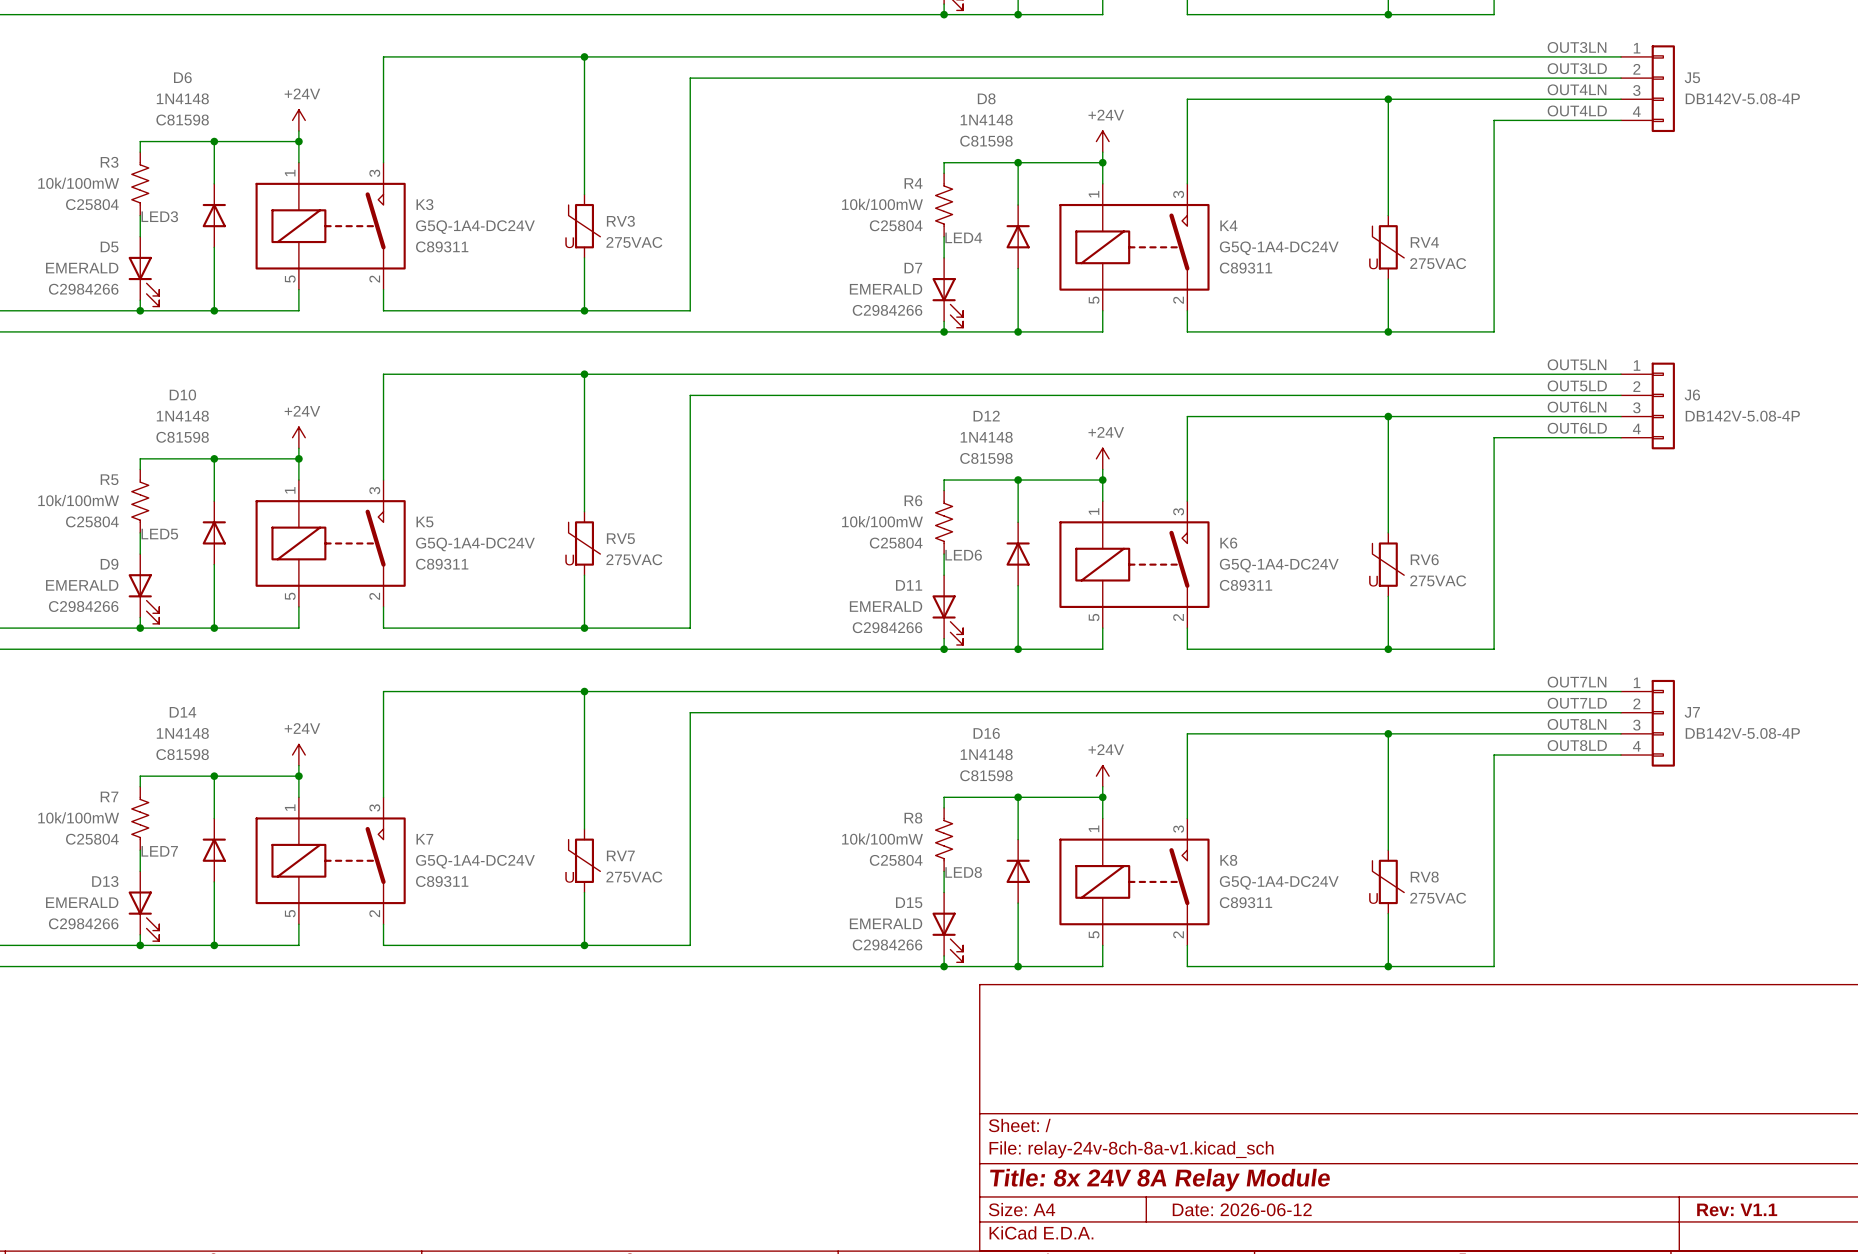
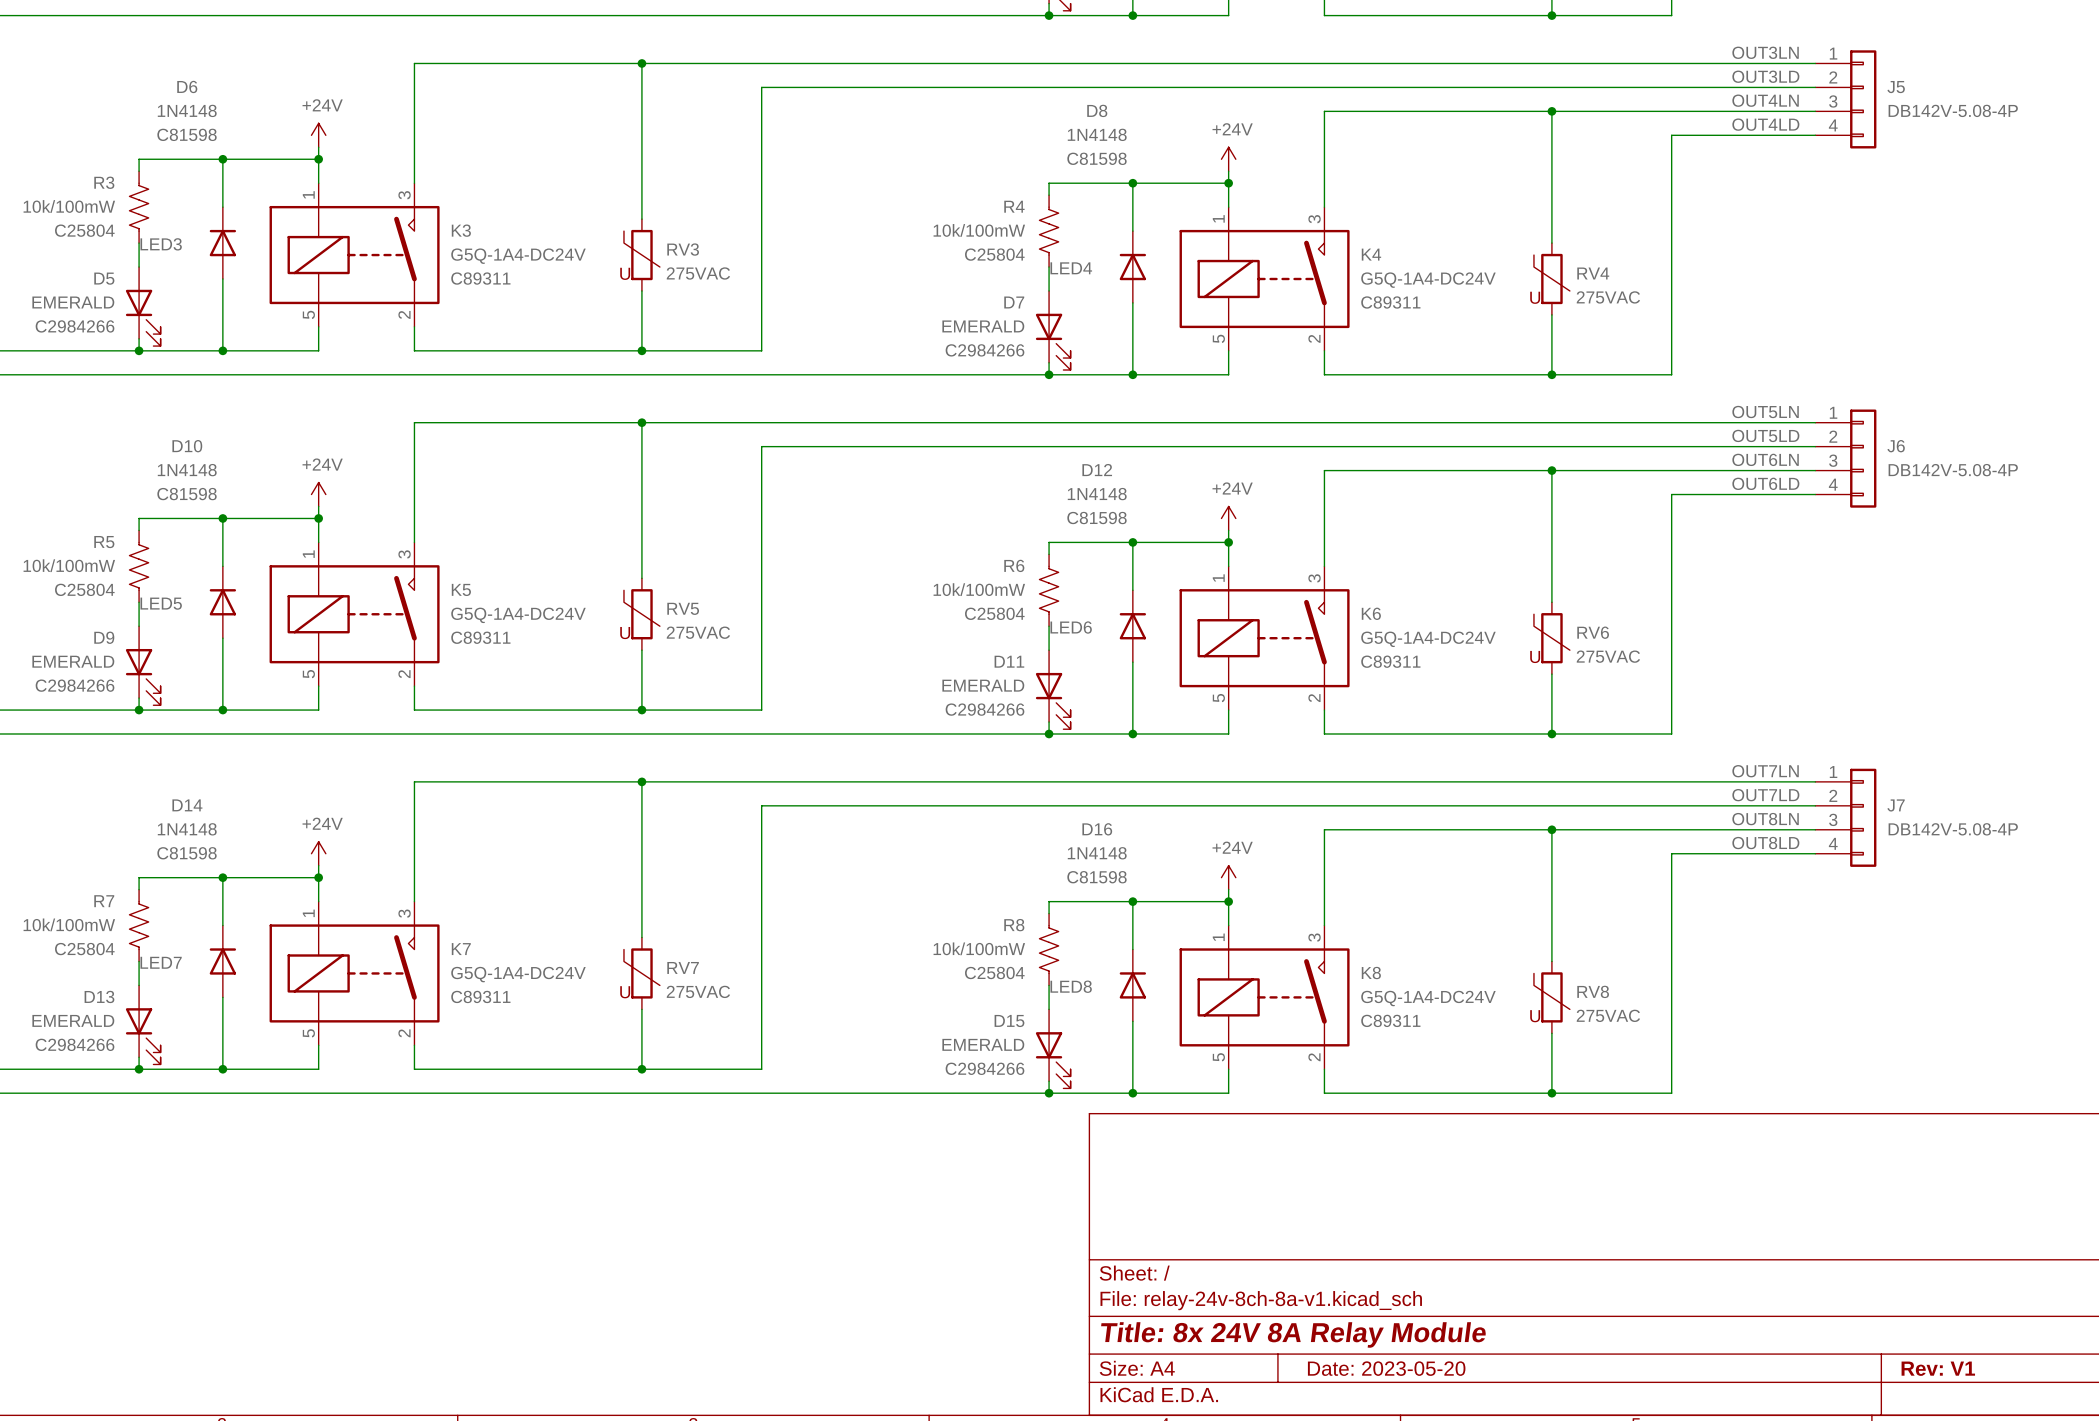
title block: Date: 2026-06-12 (1242, 1209) -> Date: 2023-05-20 (1386, 1368)
title block: Rev: V1.1 (1737, 1209) -> Rev: V1 (1938, 1368)

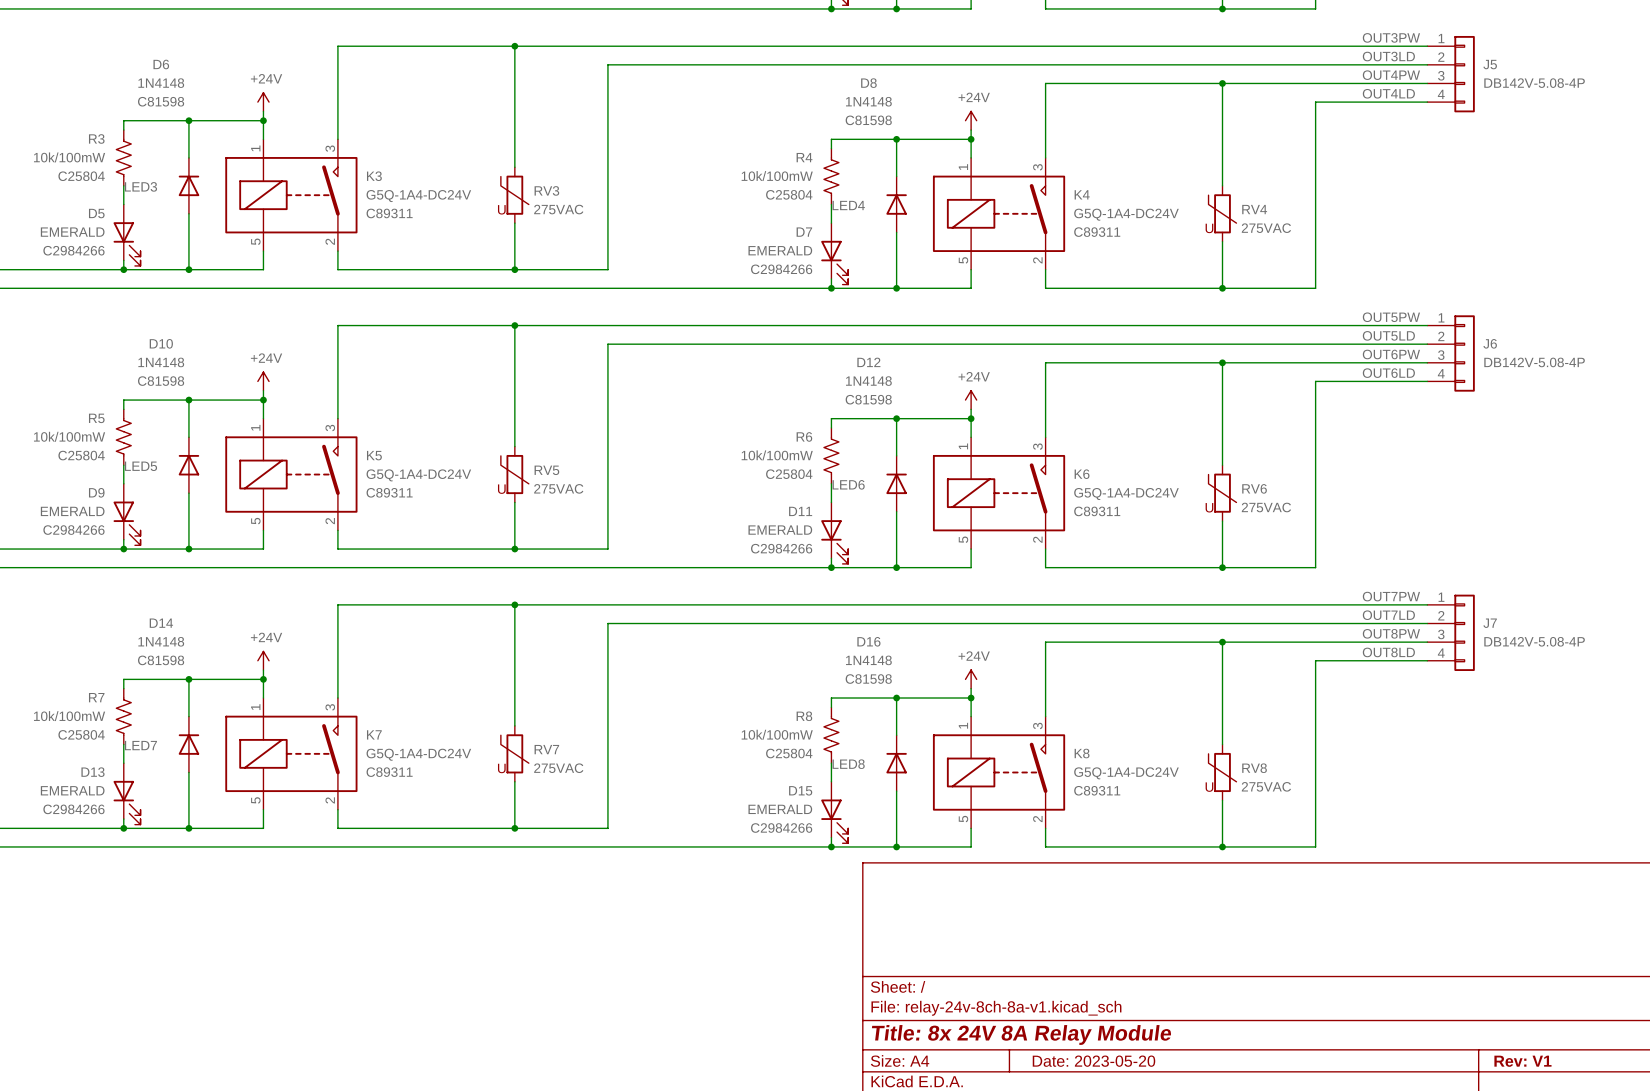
label: OUT3LN (1765, 52) -> OUT3PW (1391, 37)
label: OUT4LN (1765, 100) -> OUT4PW (1391, 75)
label: OUT5LN (1765, 411) -> OUT5PW (1391, 317)
label: OUT6LN (1765, 459) -> OUT6PW (1391, 354)
label: OUT7LN (1765, 771) -> OUT7PW (1391, 596)
label: OUT8LN (1765, 819) -> OUT8PW (1391, 633)

